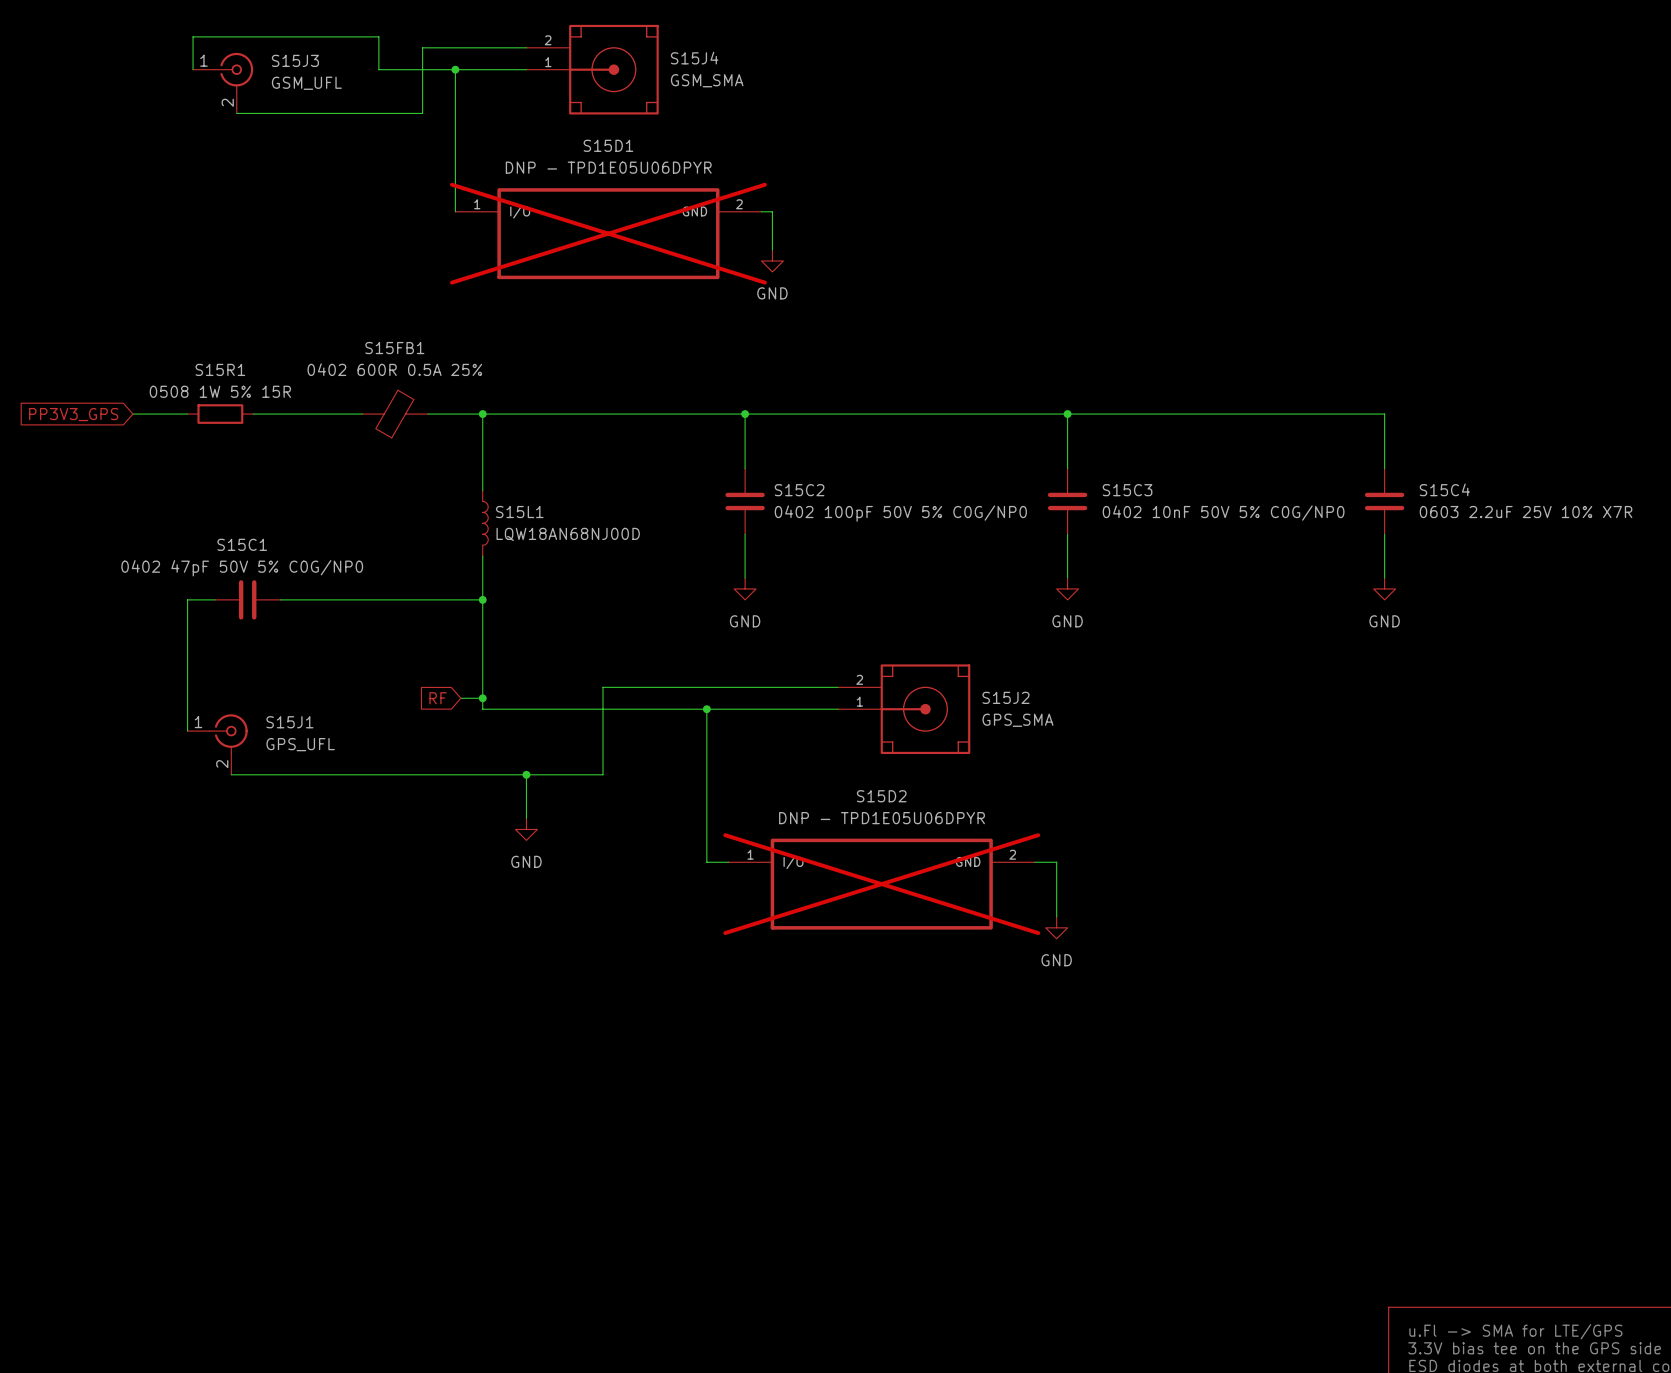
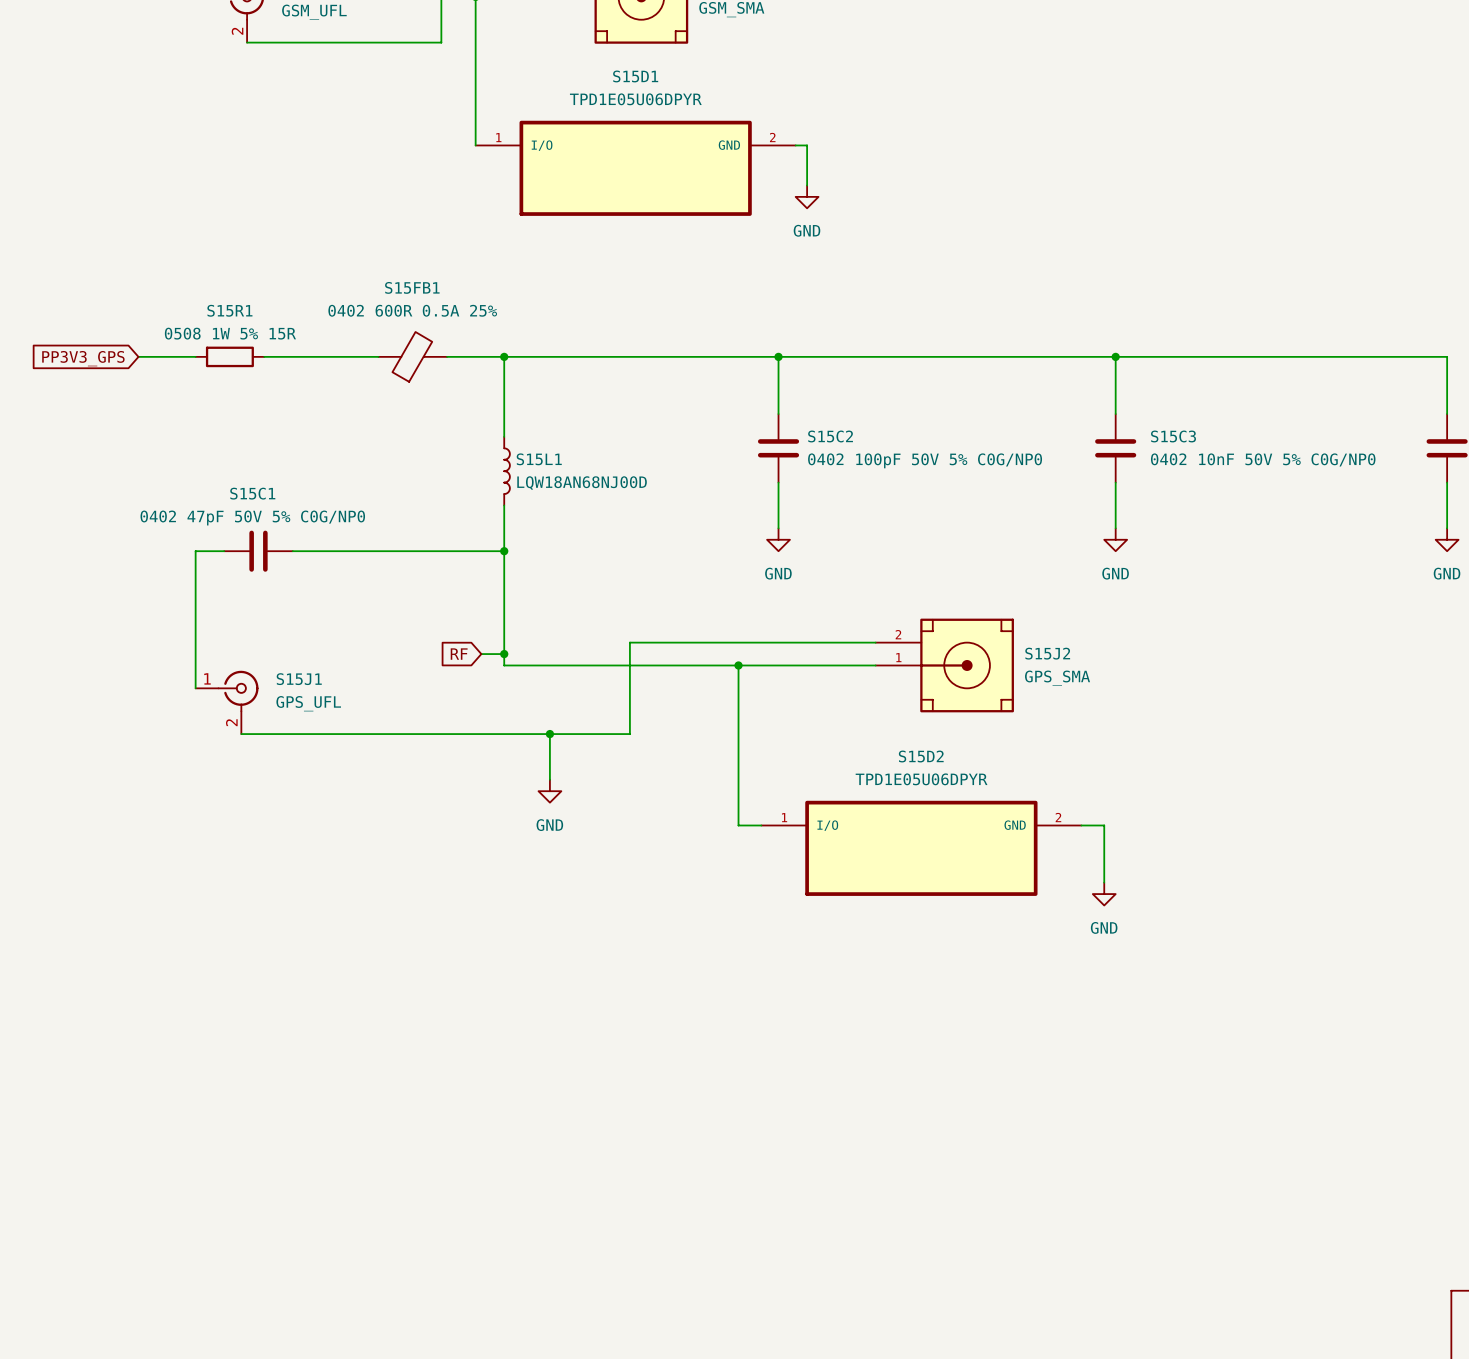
S15D1 value: DNP - TPD1E05U06DPYR (608, 167) -> TPD1E05U06DPYR (635, 99)
S15D1 do-not-place cross: (608, 233) -> none
S15D2 value: DNP - TPD1E05U06DPYR (882, 818) -> TPD1E05U06DPYR (921, 779)
S15D2 do-not-place cross: (881, 884) -> none

